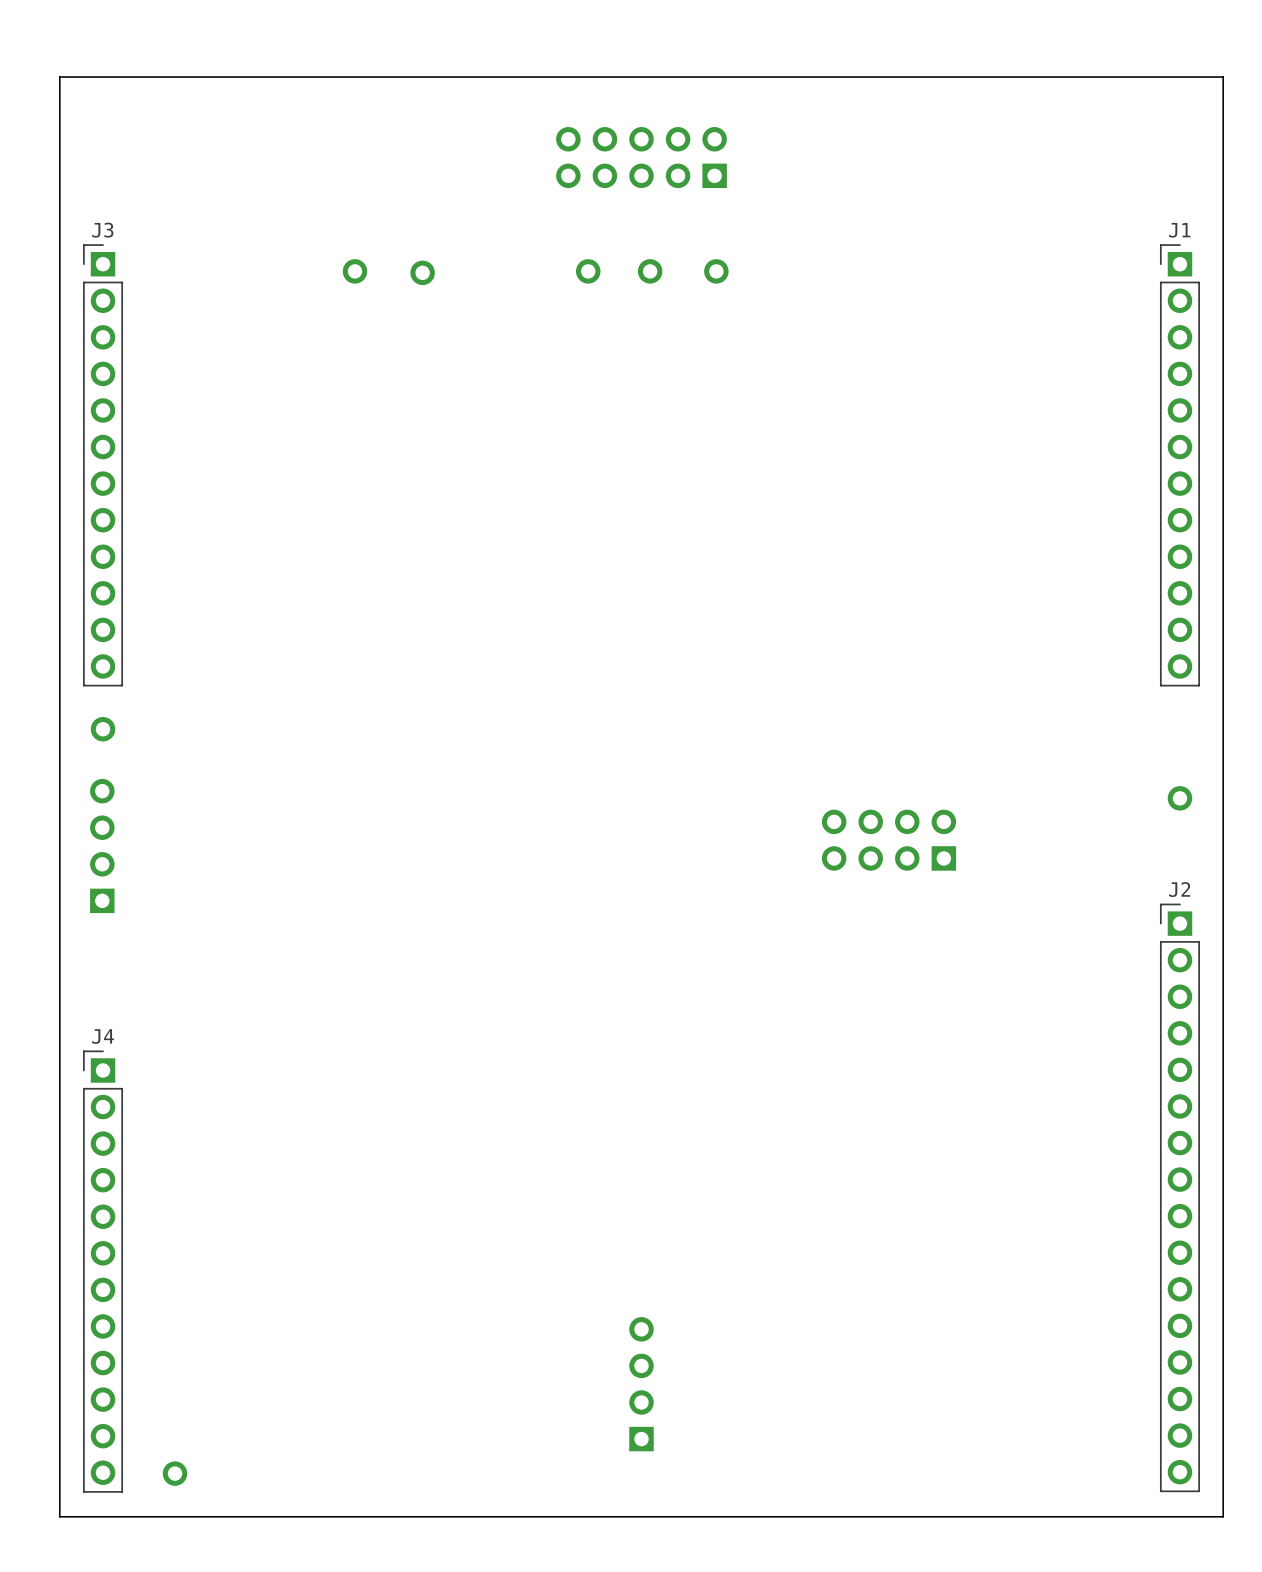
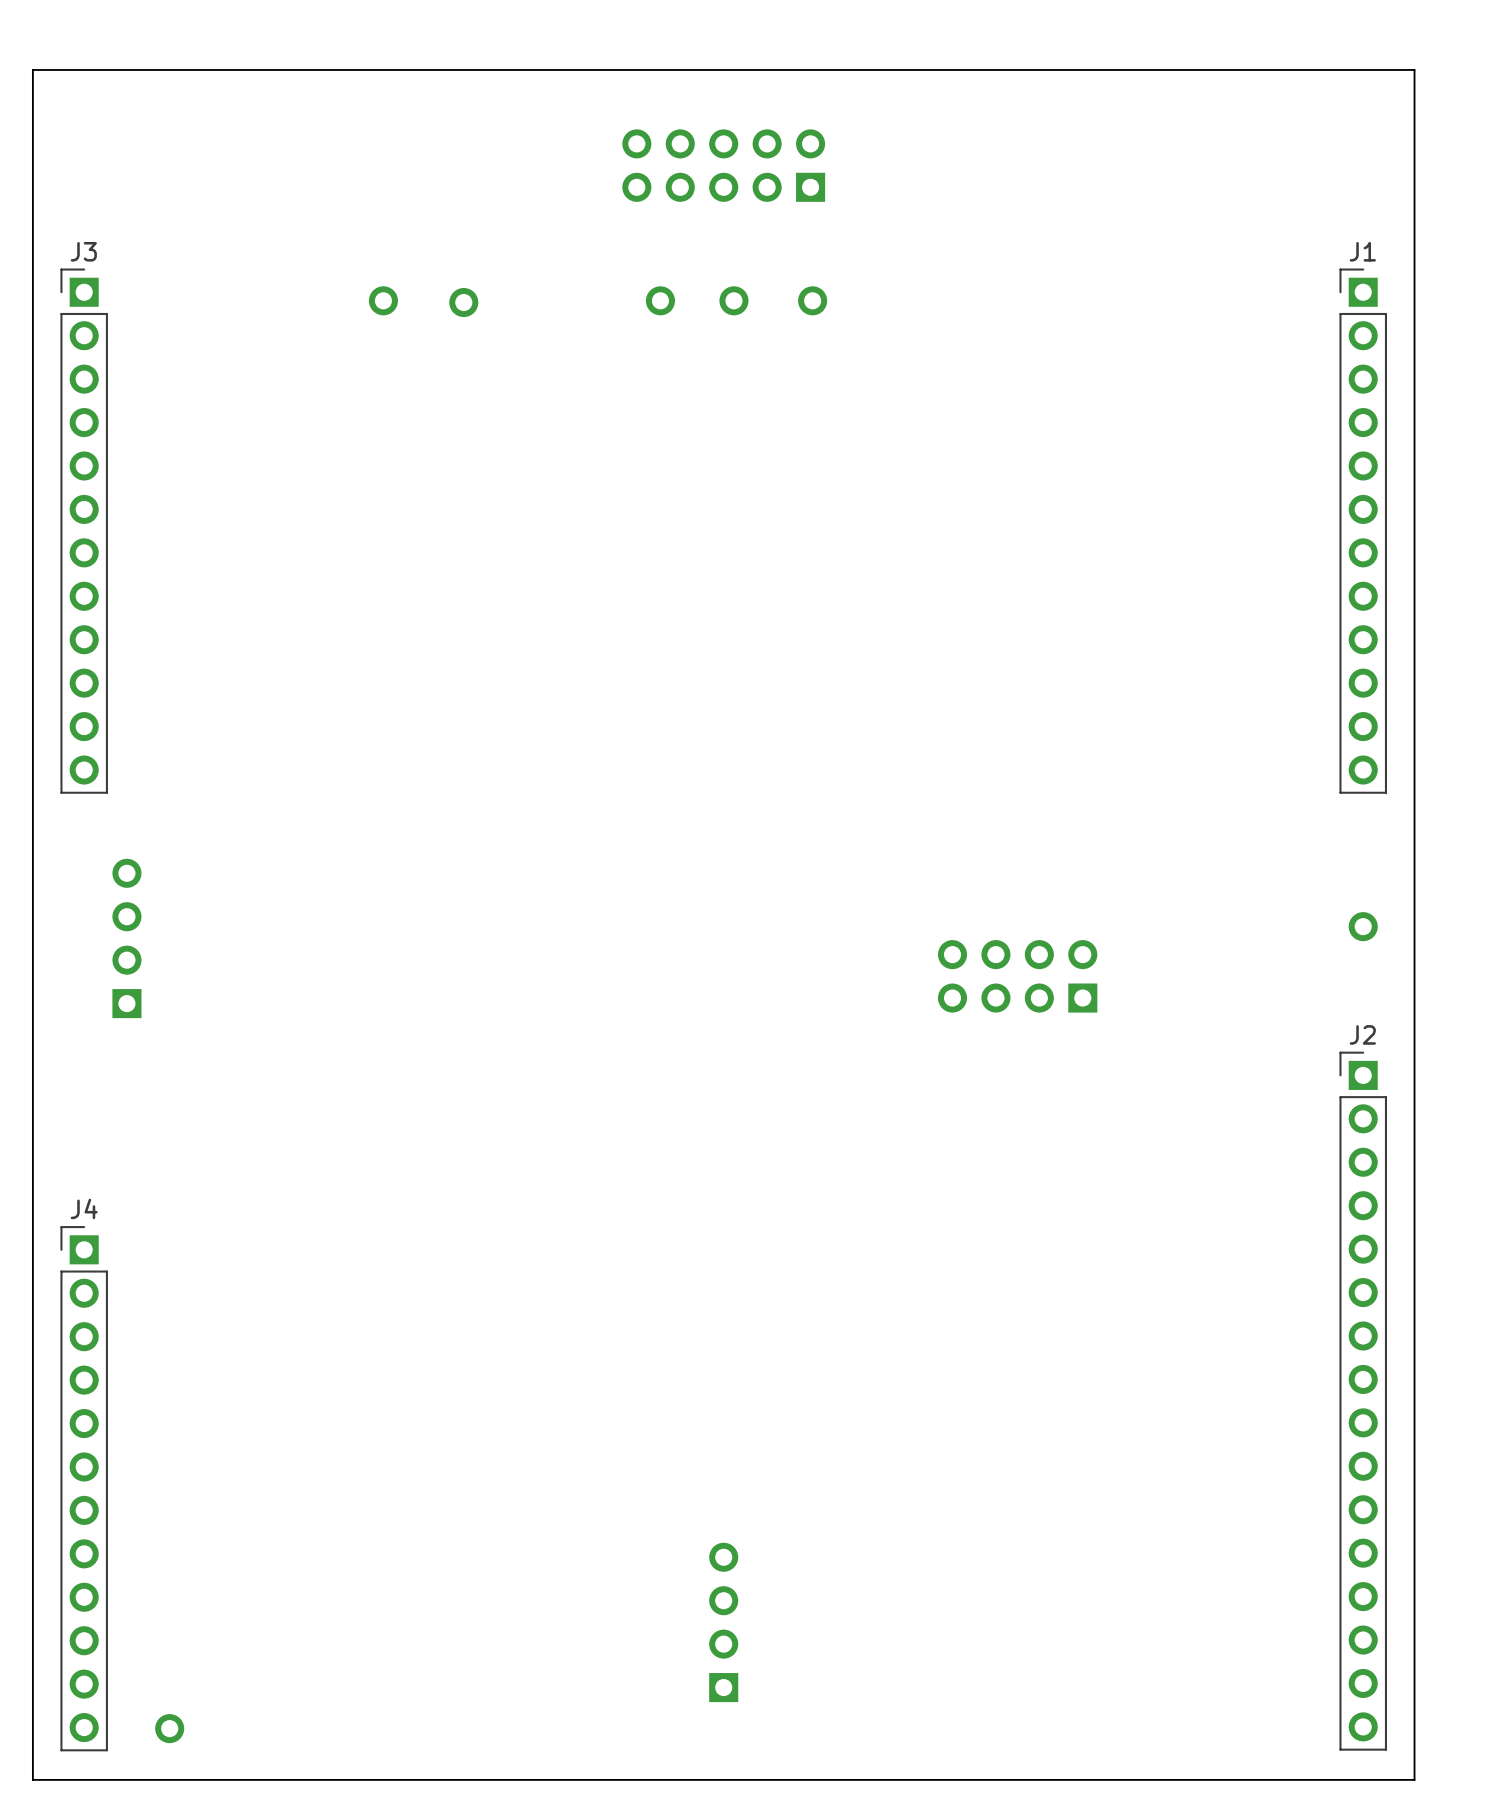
part: (103, 729) -> none
part position: (102, 846) -> (126, 938)

